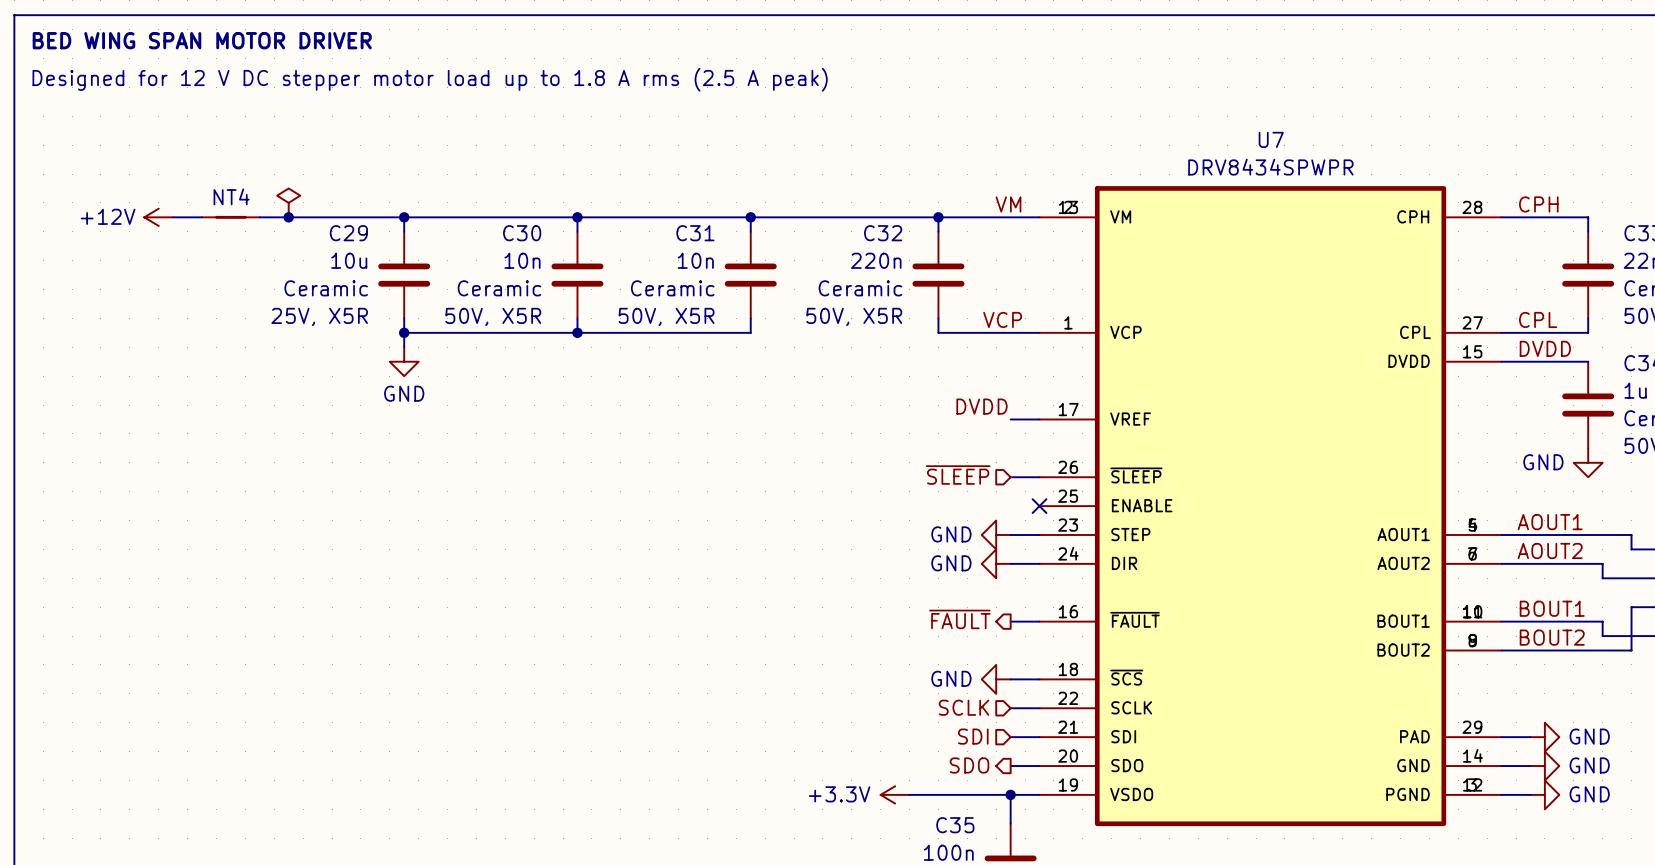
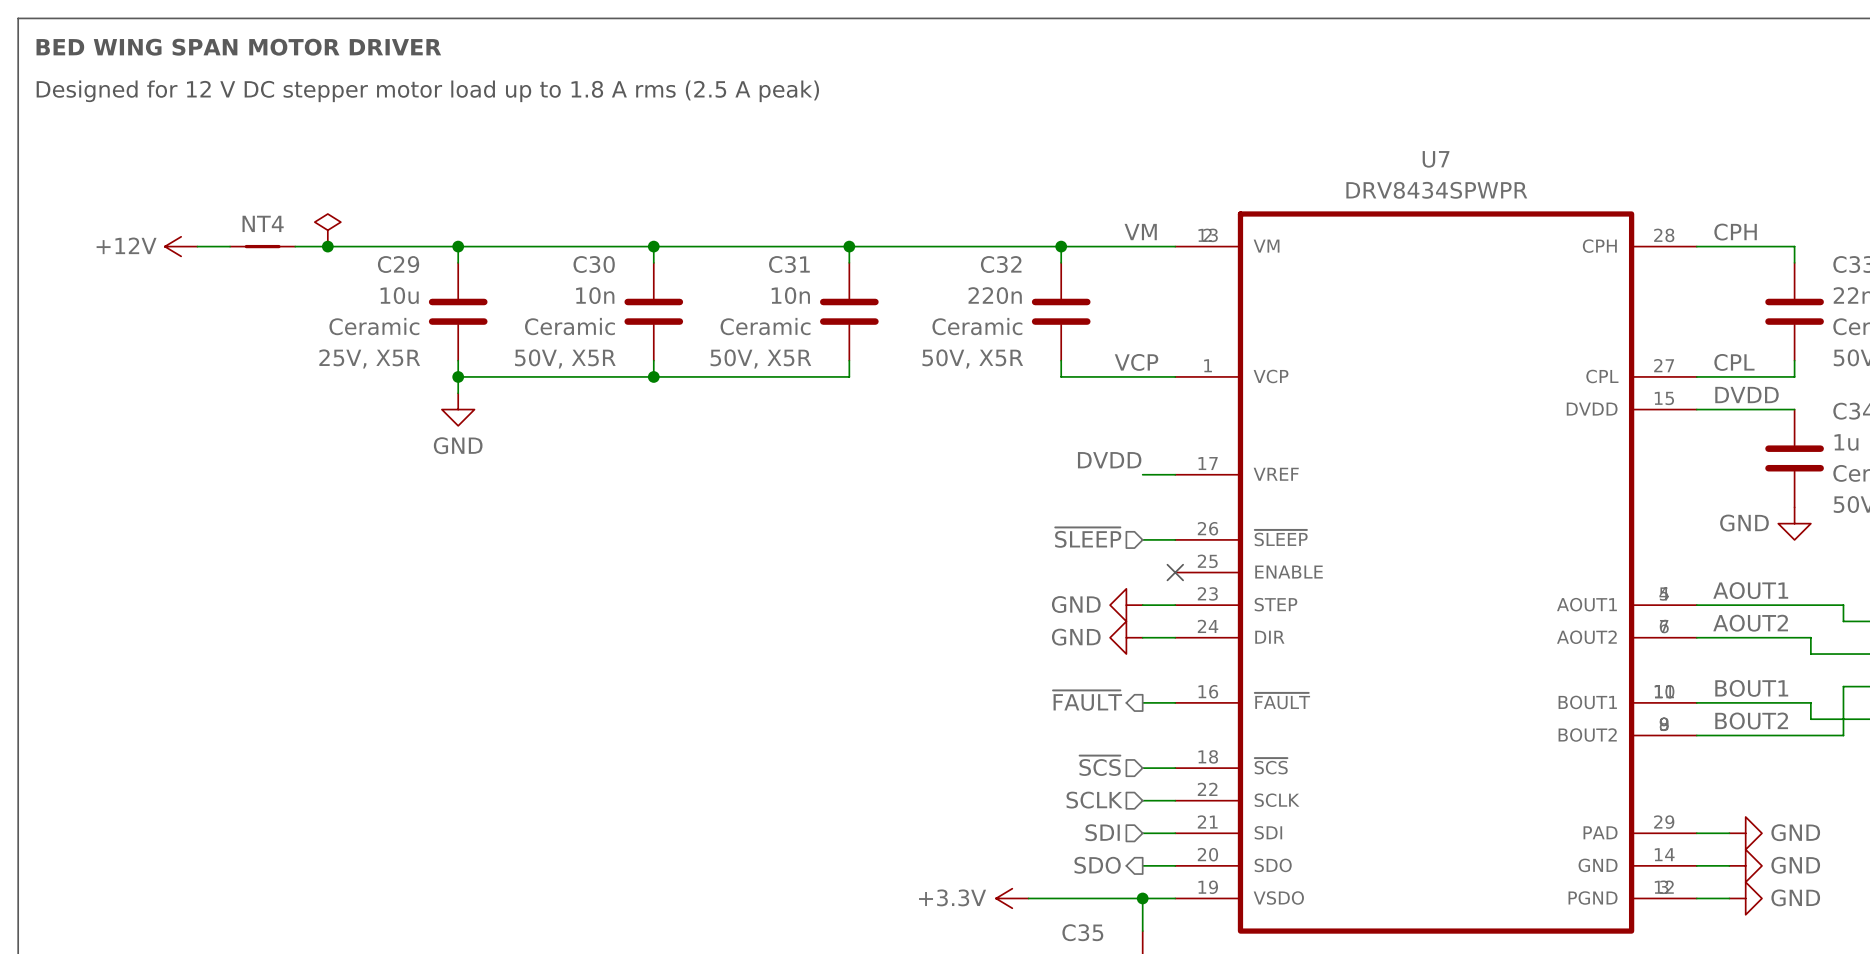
hierarchical label: none -> ~{SCS} (1100, 765)
power symbol: GND (996, 679) -> none

